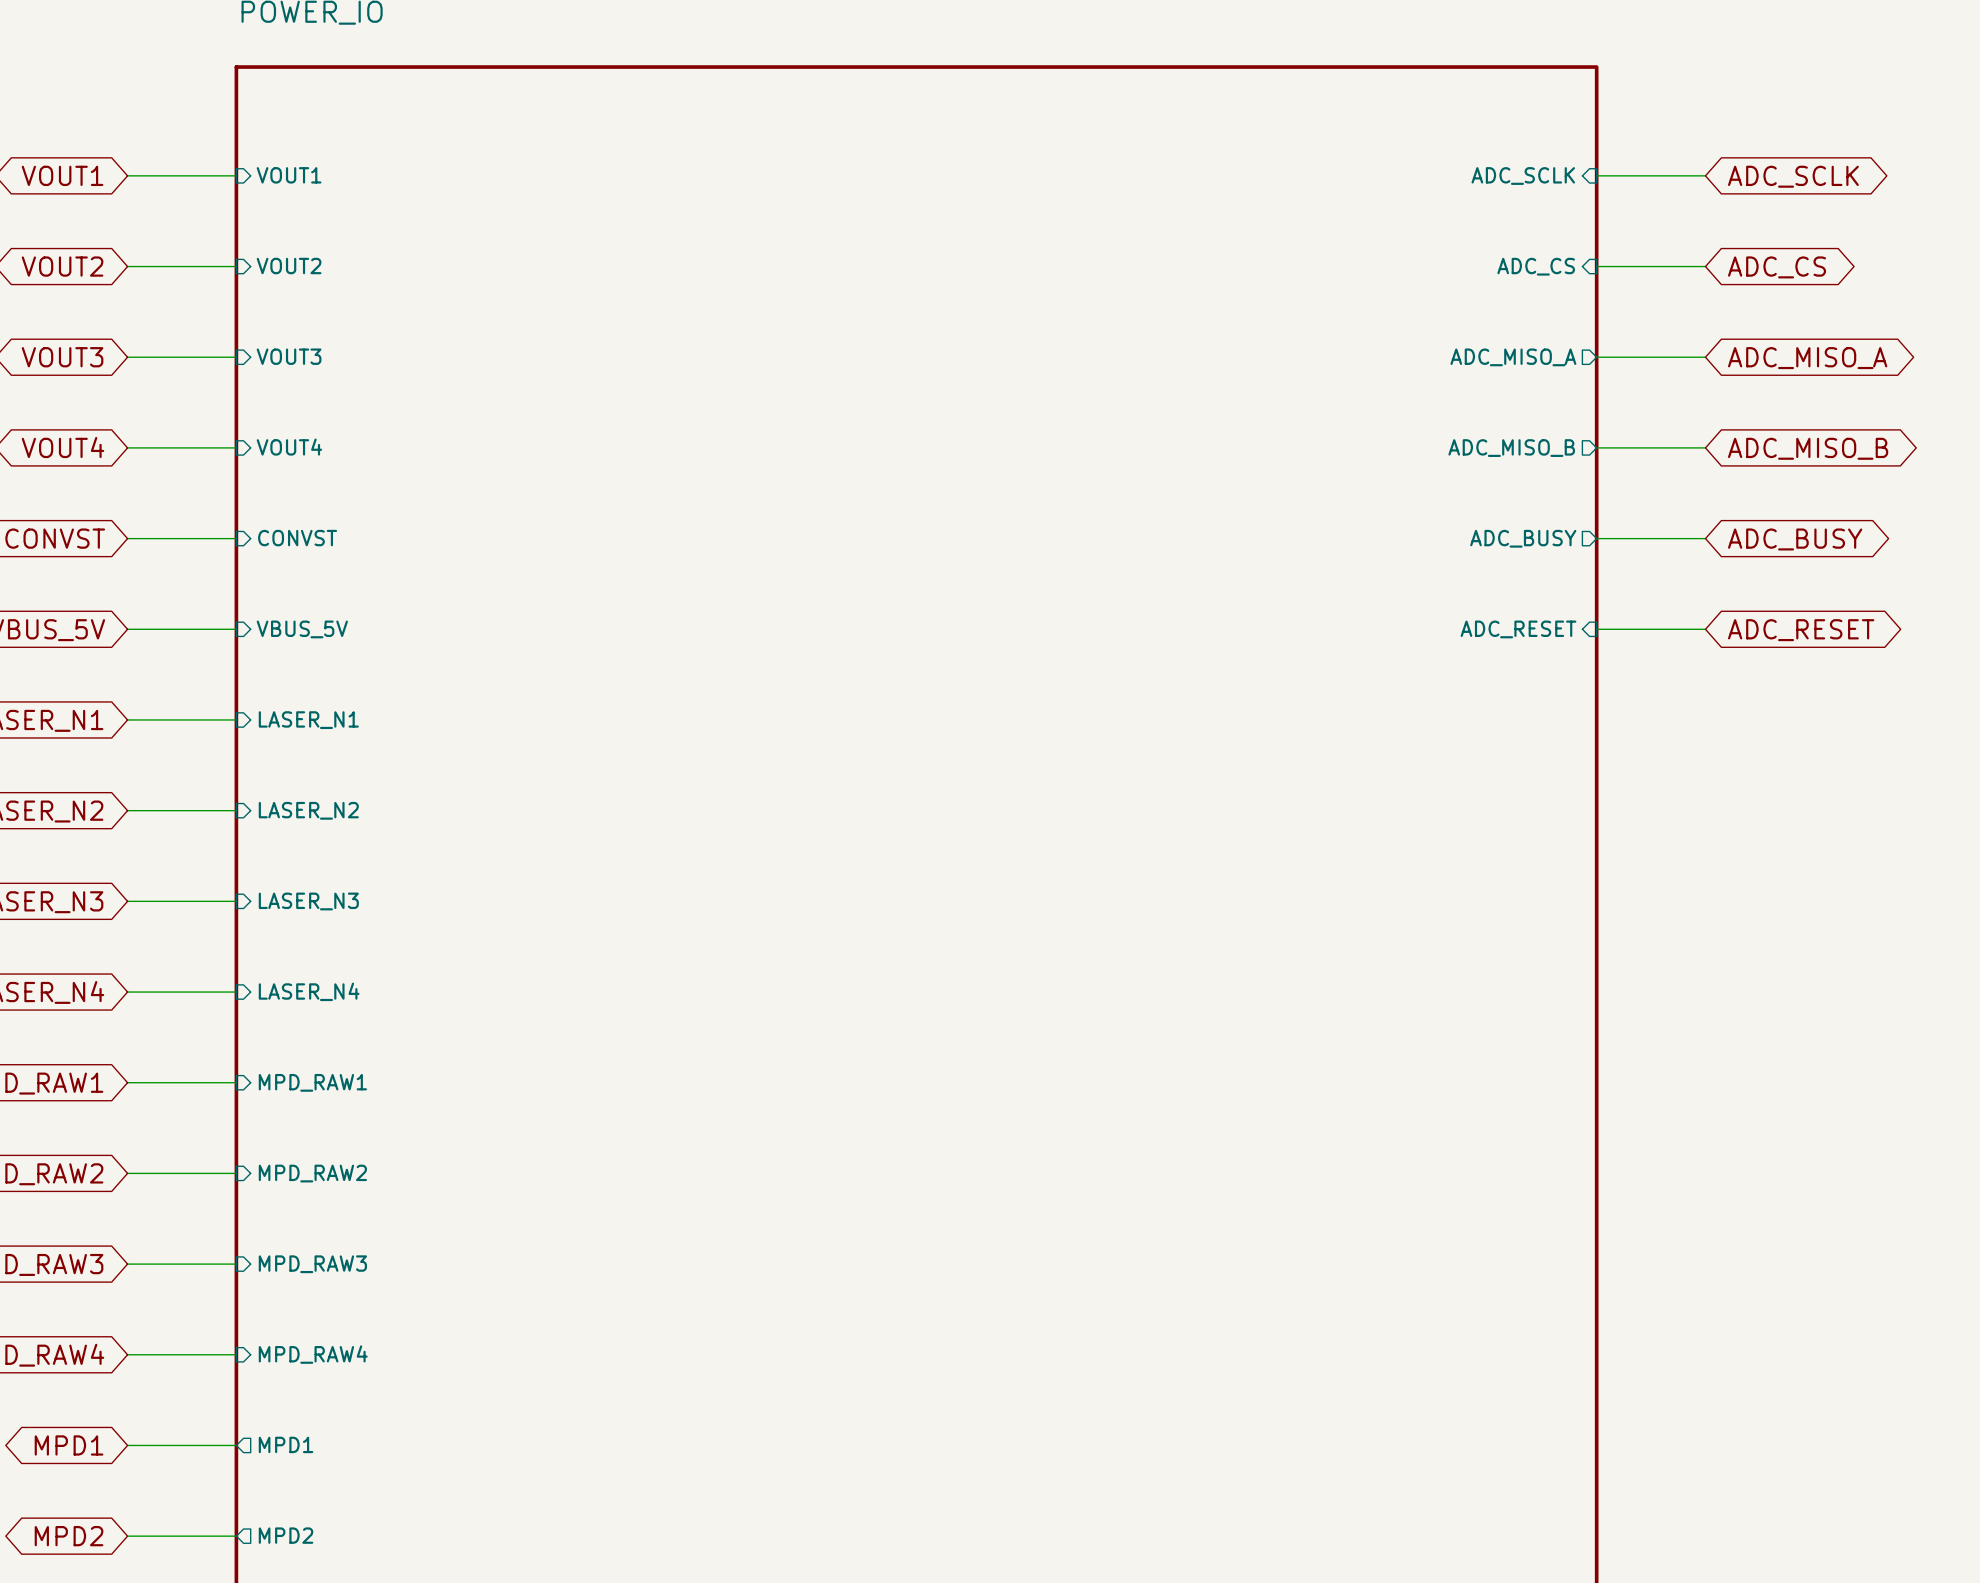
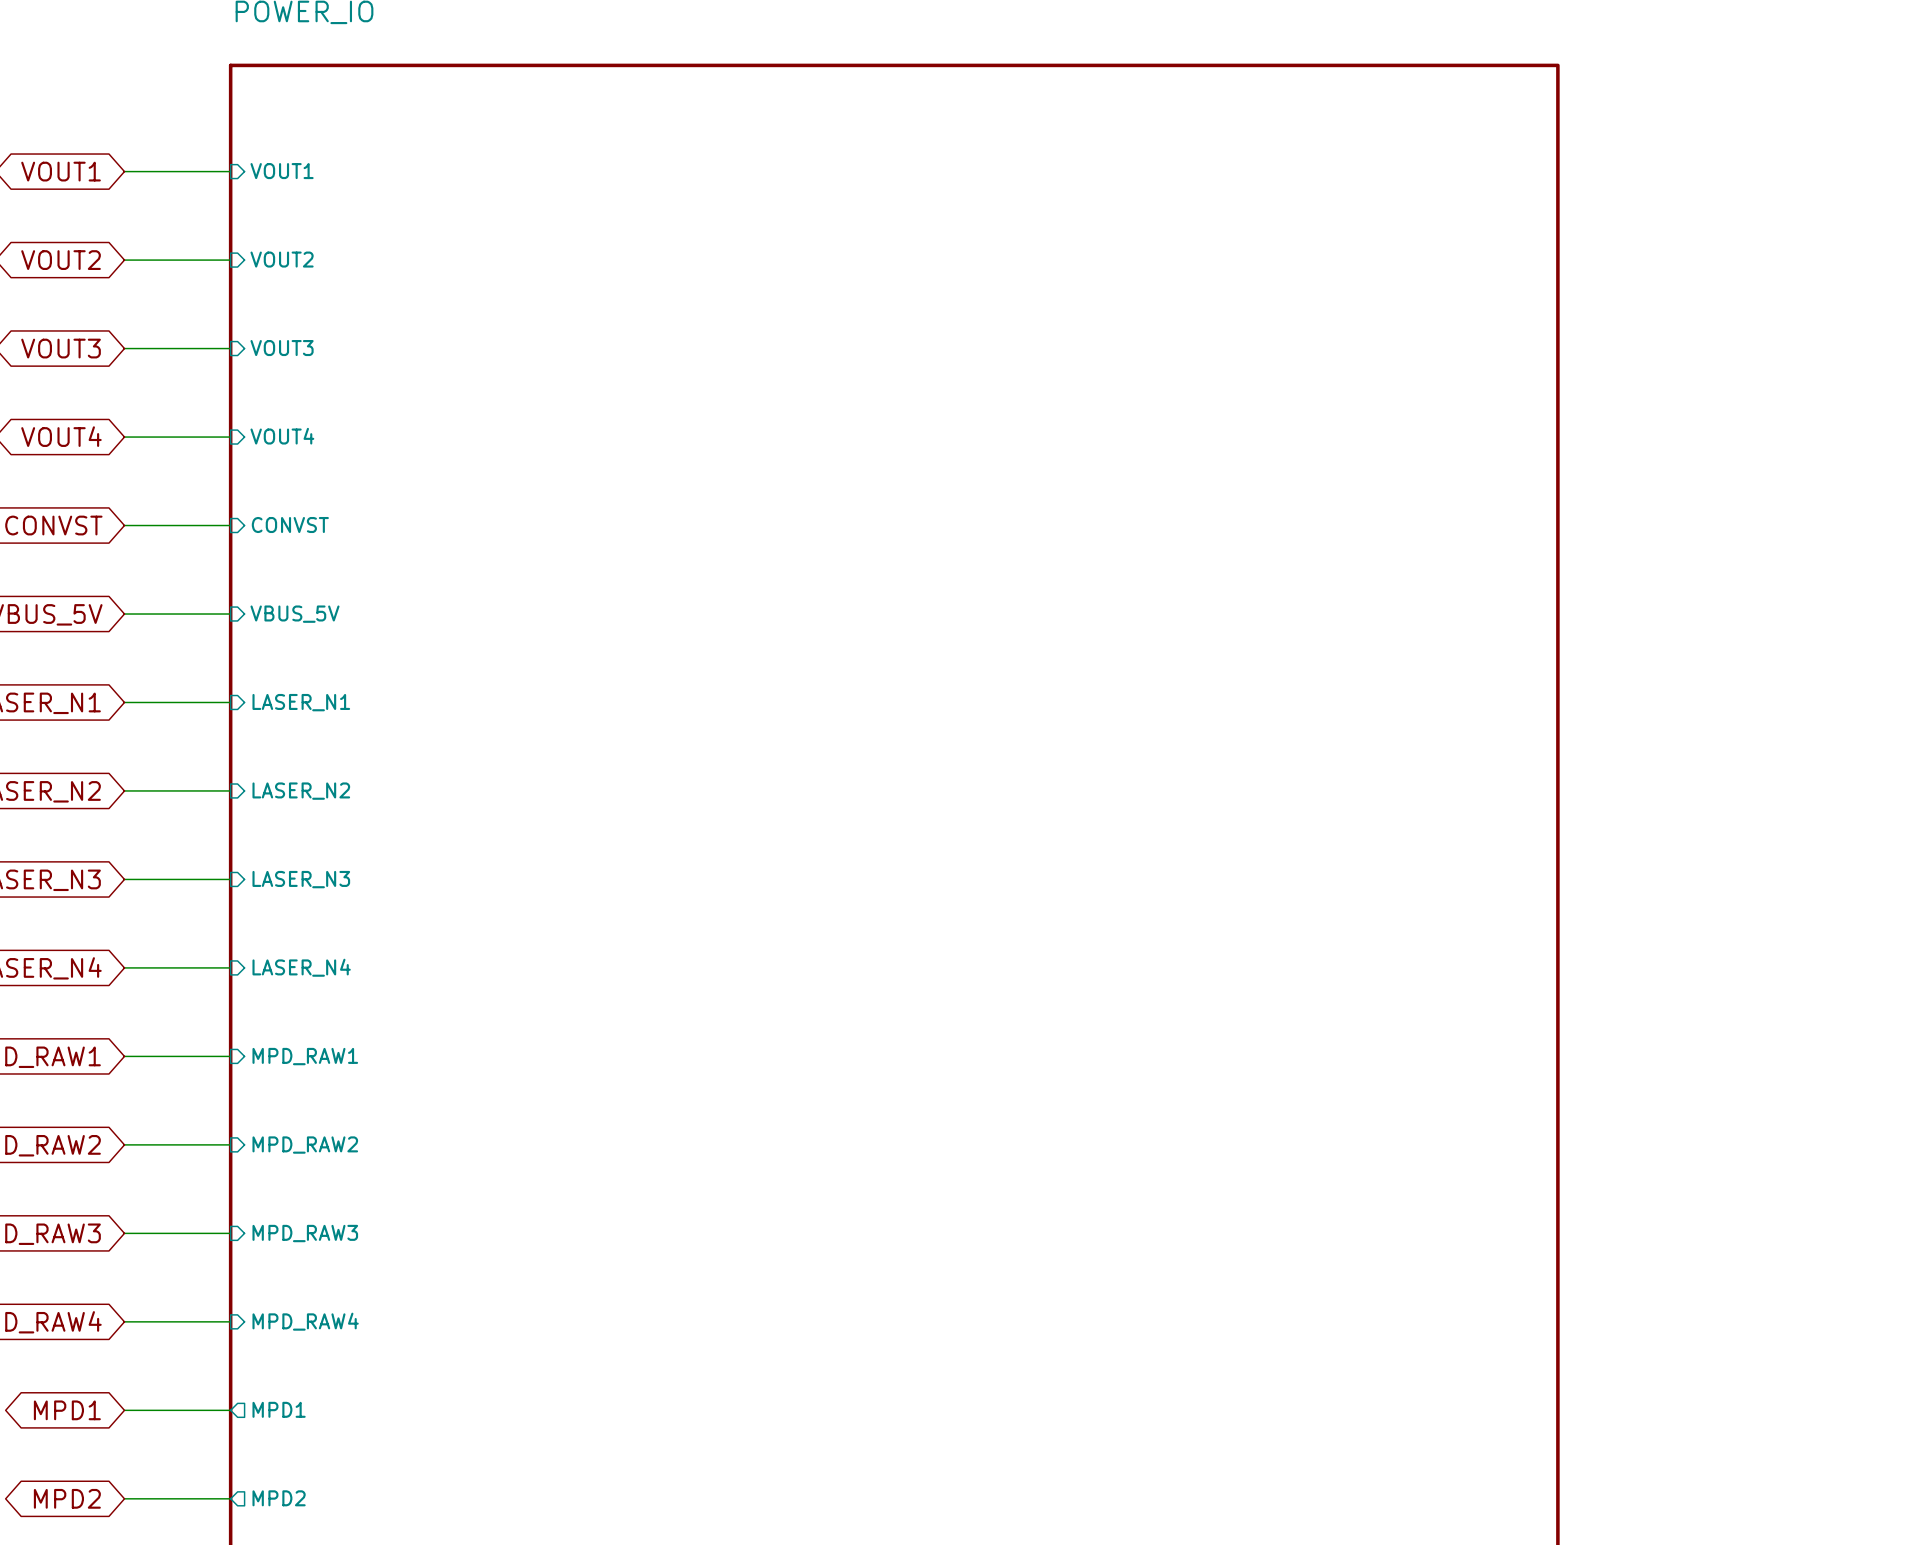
wire: (1596, 175) (1705, 175) -> none
sheet pin: ADC_SCLK (1523, 176) -> none
global label: ADC_SCLK (1793, 176) -> none
sheet pin: ADC_CS (1536, 266) -> none
wire: (1596, 266) (1705, 266) -> none
global label: ADC_CS (1777, 267) -> none
sheet pin: ADC_MISO_A (1513, 357) -> none
wire: (1596, 357) (1705, 357) -> none
global label: ADC_MISO_A (1807, 358) -> none
wire: (1596, 447) (1705, 447) -> none
sheet pin: ADC_MISO_B (1511, 448) -> none
global label: ADC_MISO_B (1808, 448) -> none
sheet pin: ADC_BUSY (1523, 538) -> none
wire: (1596, 538) (1705, 538) -> none
global label: ADC_BUSY (1795, 539) -> none
sheet pin: ADC_RESET (1518, 629) -> none
wire: (1596, 629) (1705, 629) -> none
global label: ADC_RESET (1801, 630) -> none

